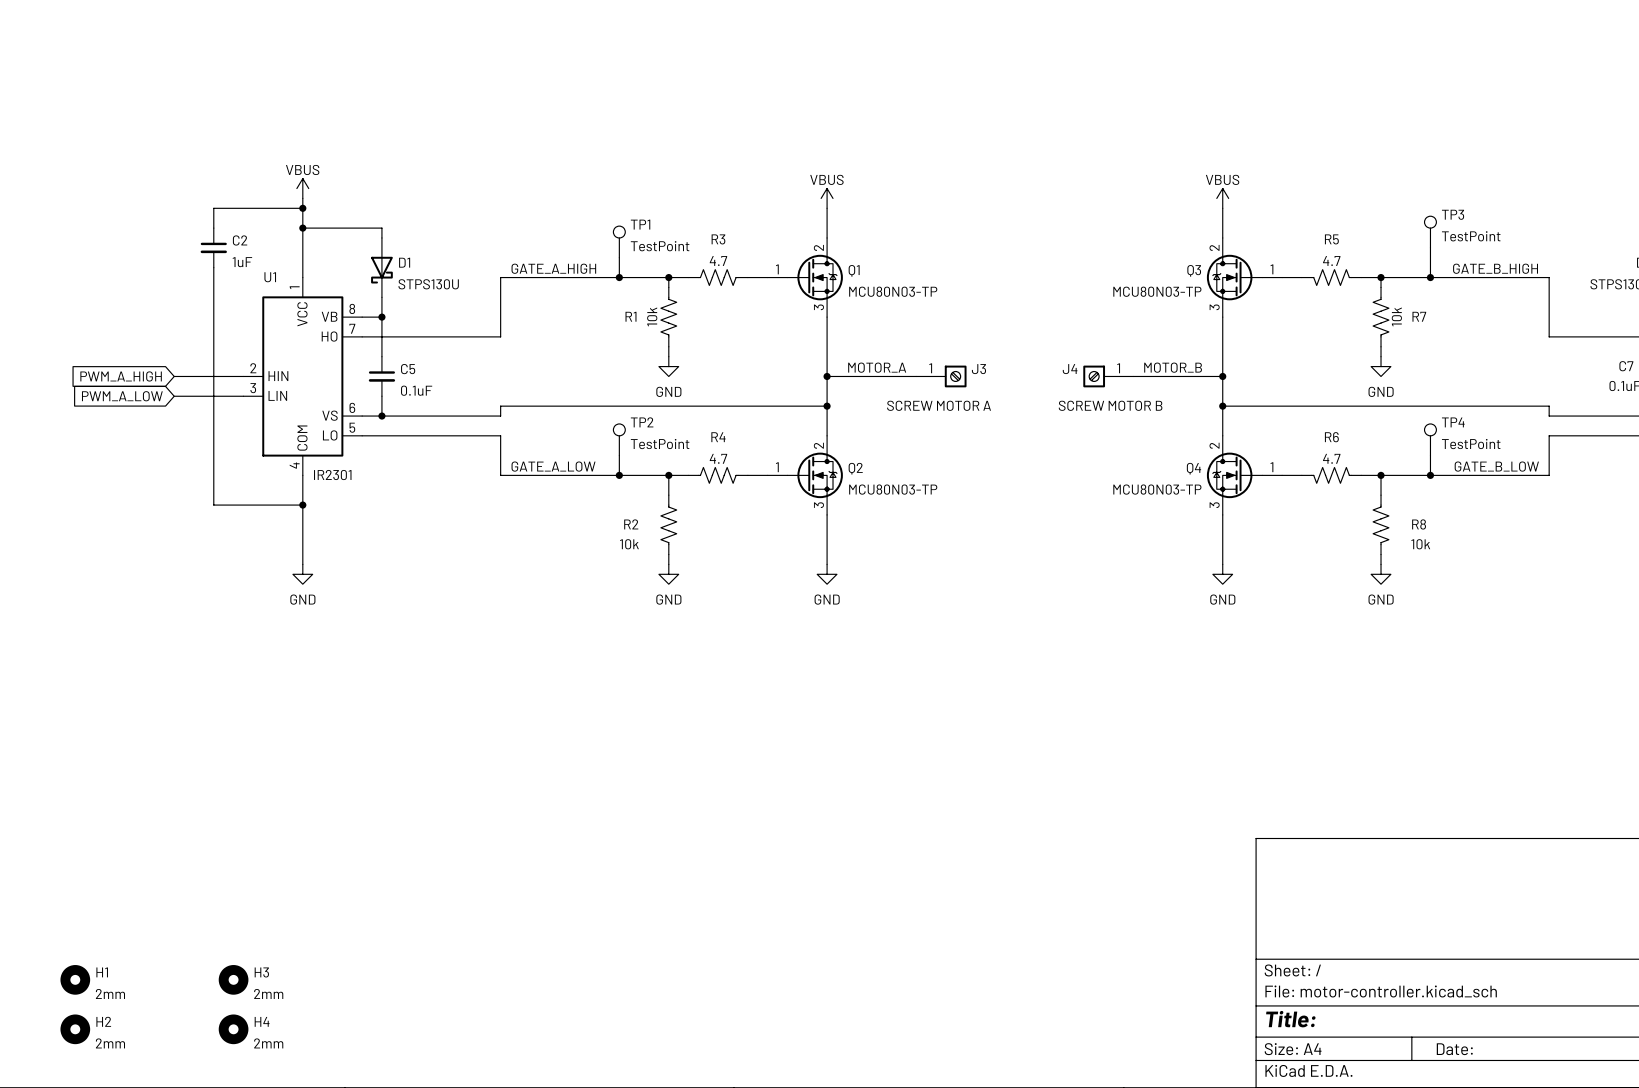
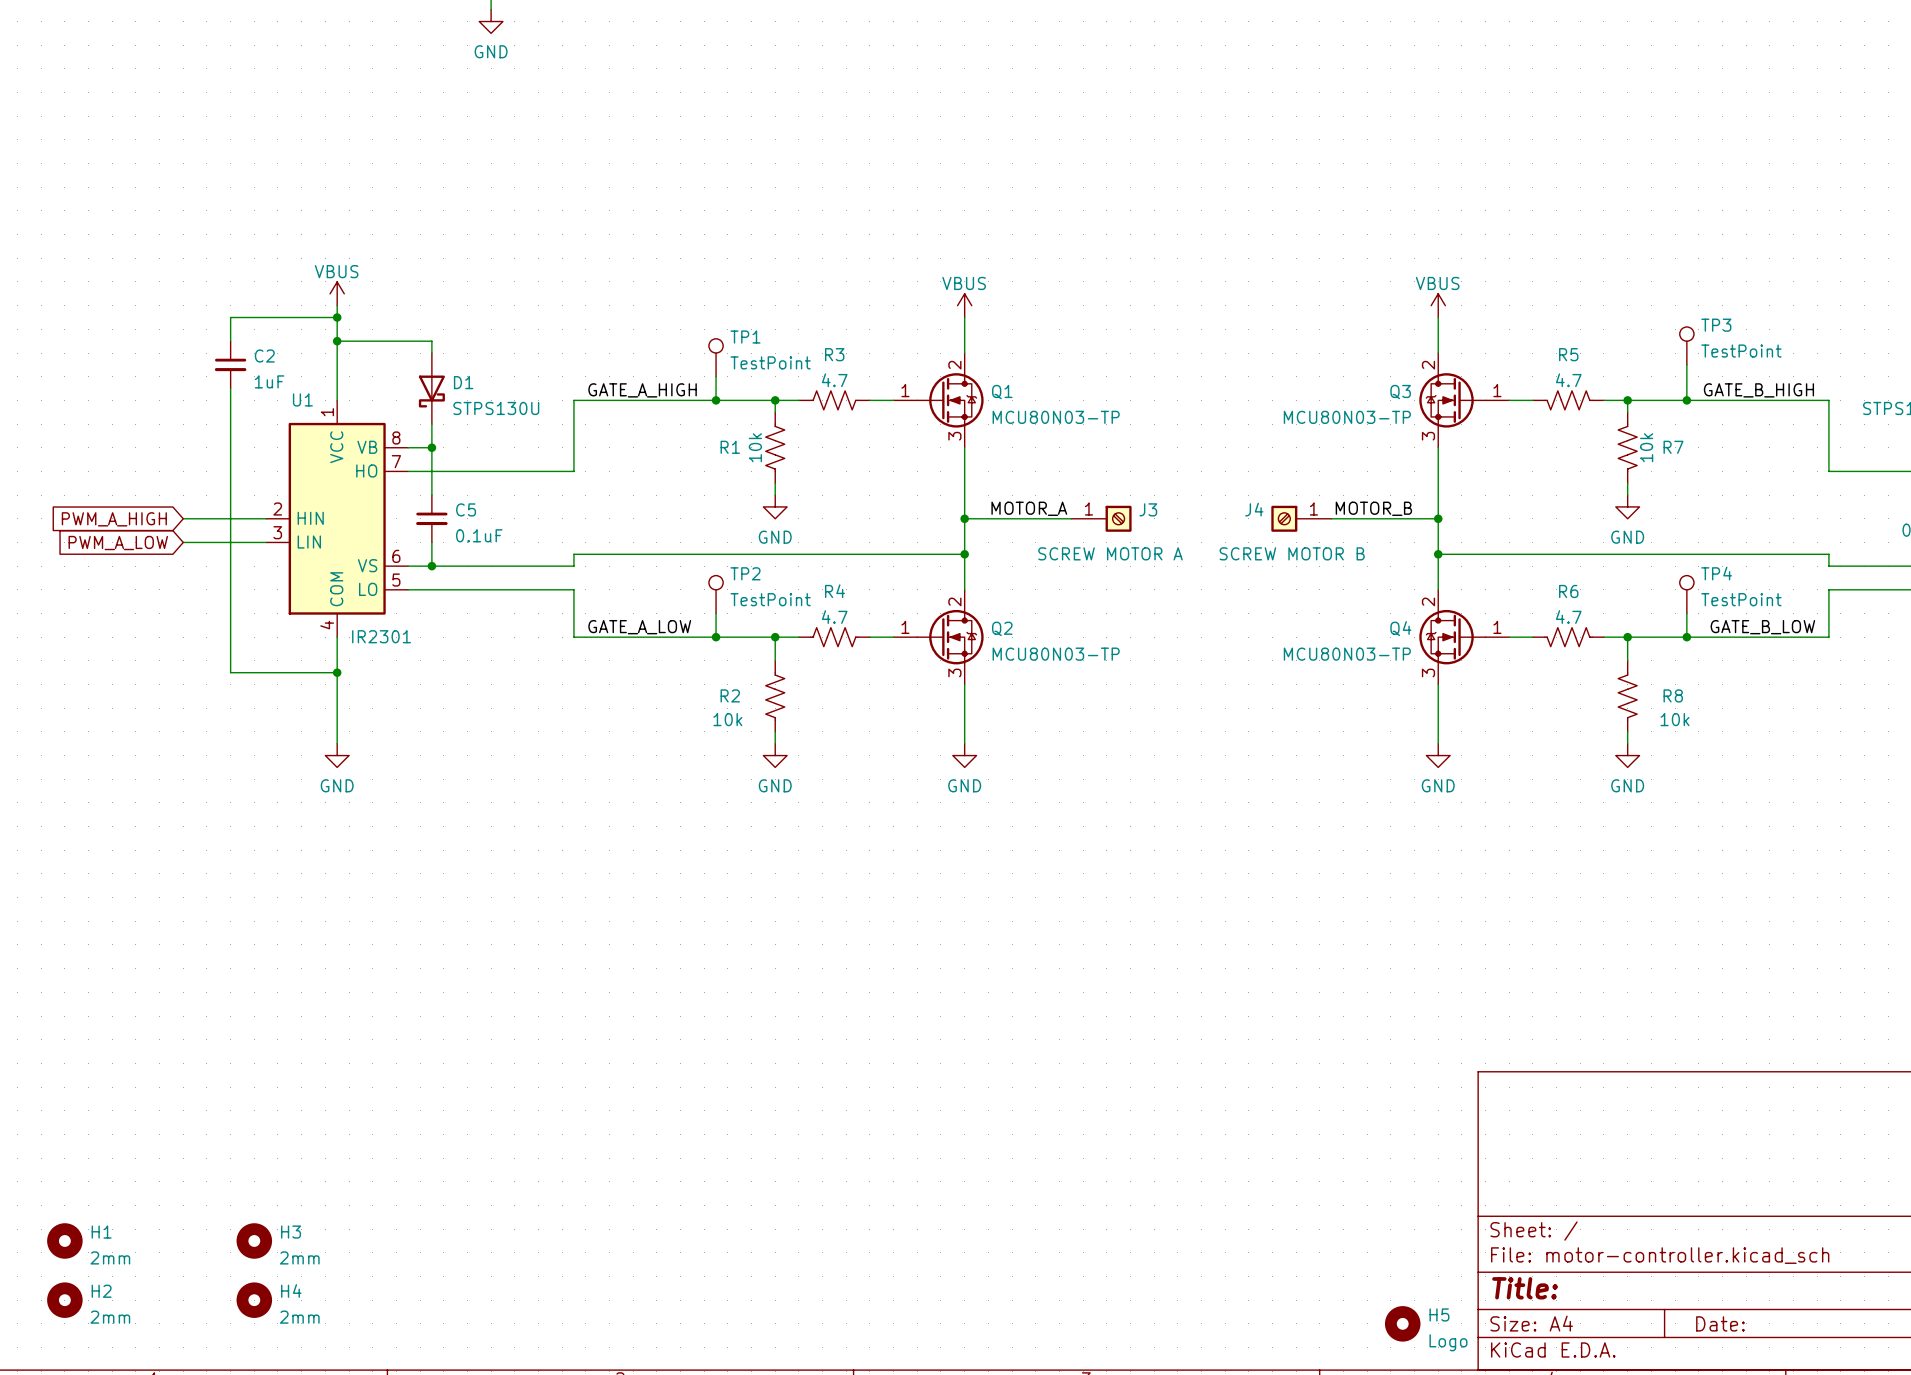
H5: none -> Logo (1402, 1323)

